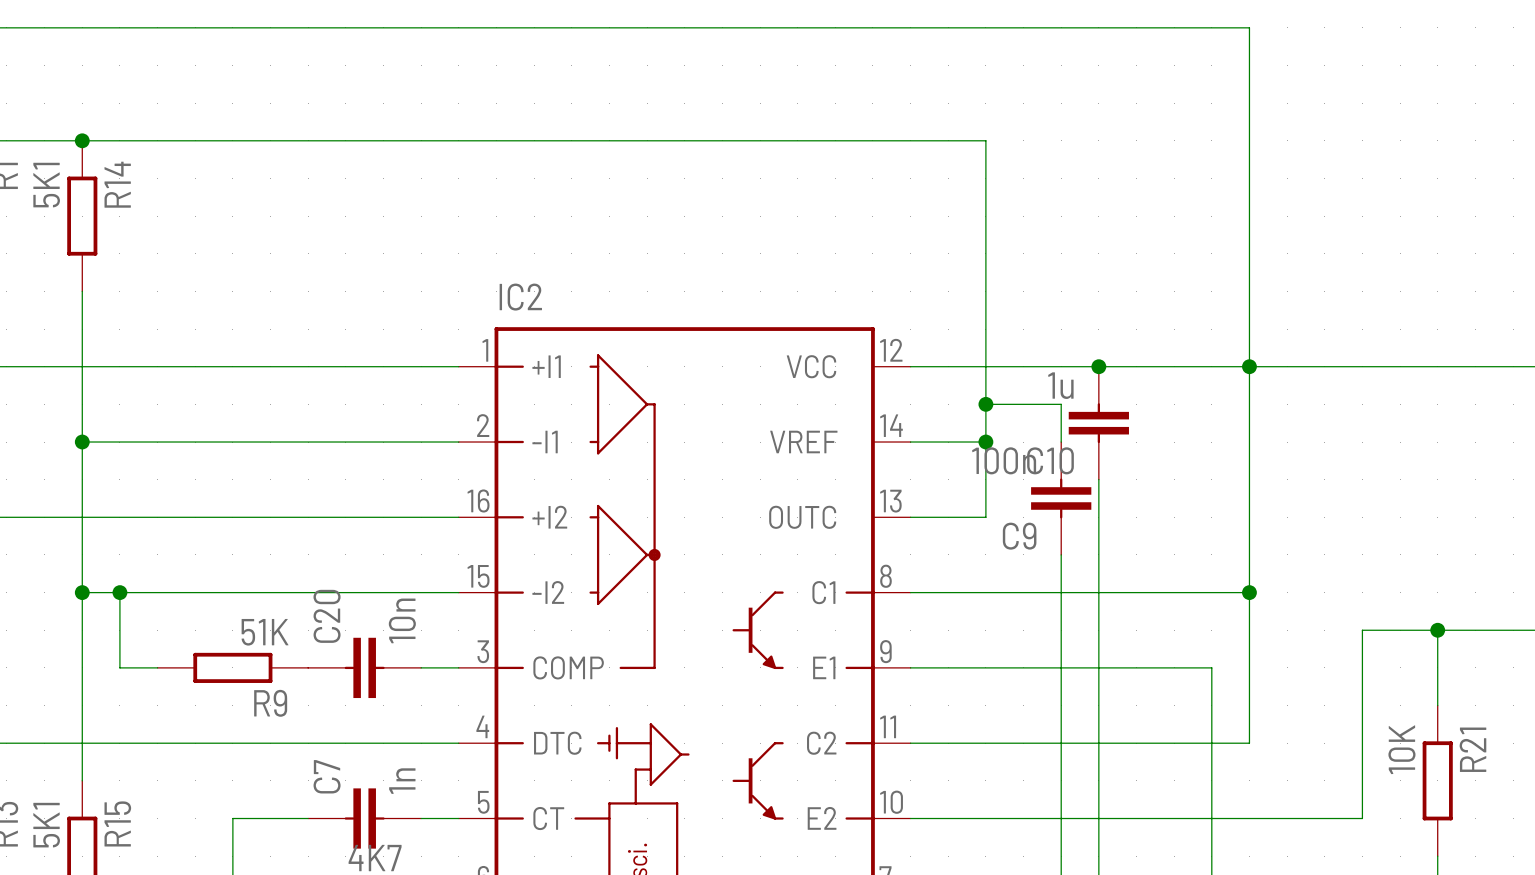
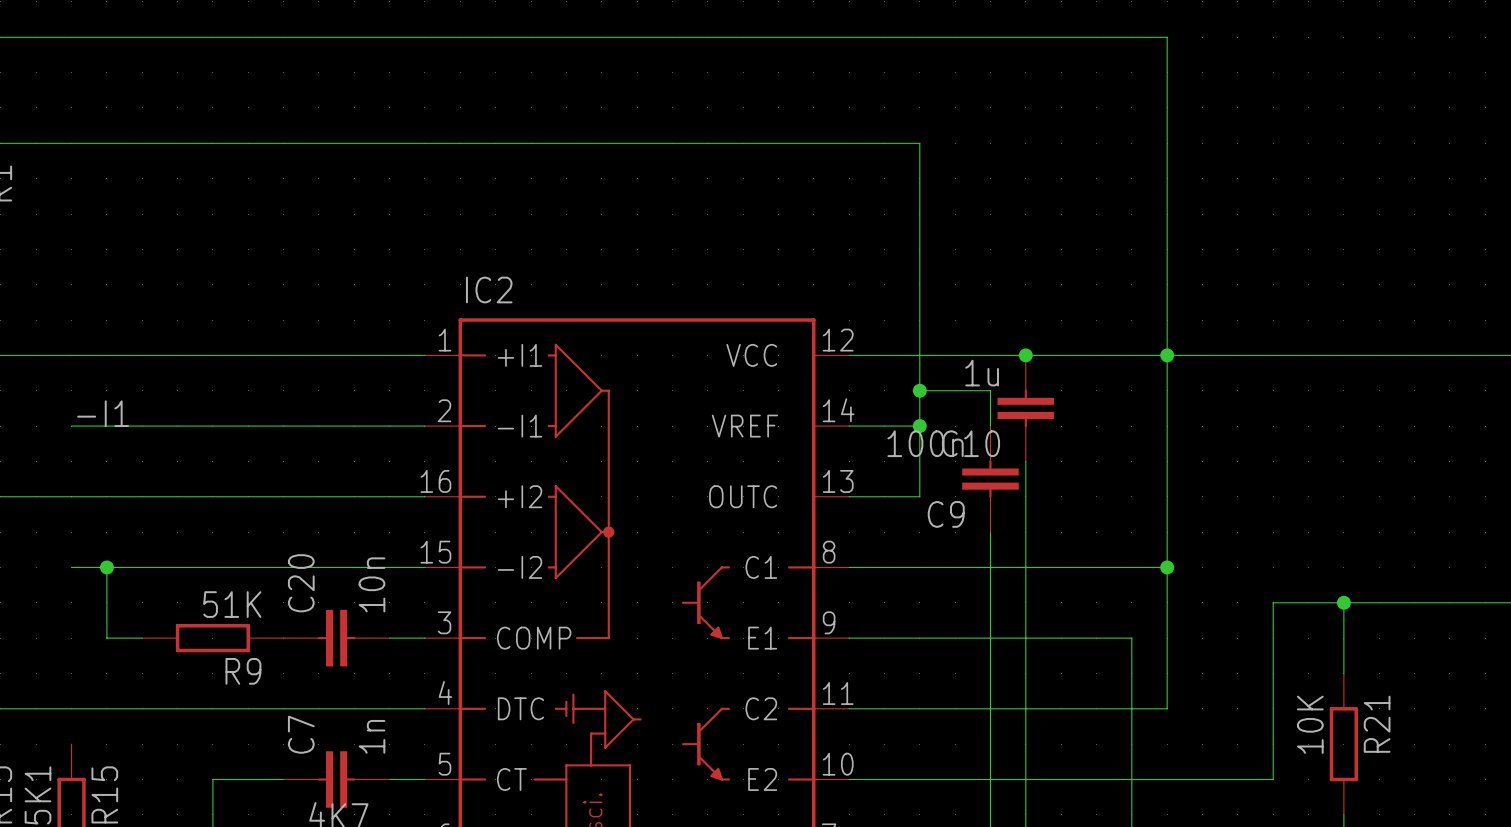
junction: (82, 140) -> none
R14: 5K1 (82, 216) -> none
wire: (82, 291) (82, 780) -> none
label: none -> -I1 (103, 413)
junction: (82, 442) -> none
junction: (82, 592) -> none

